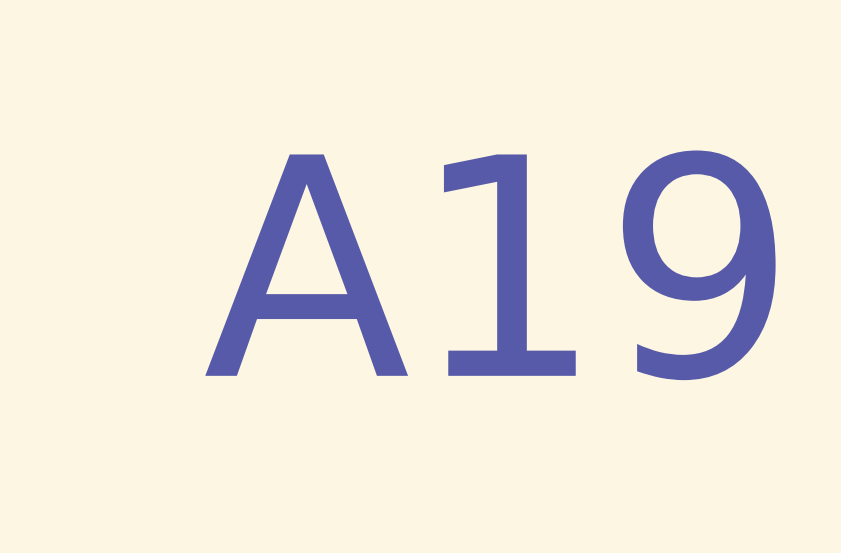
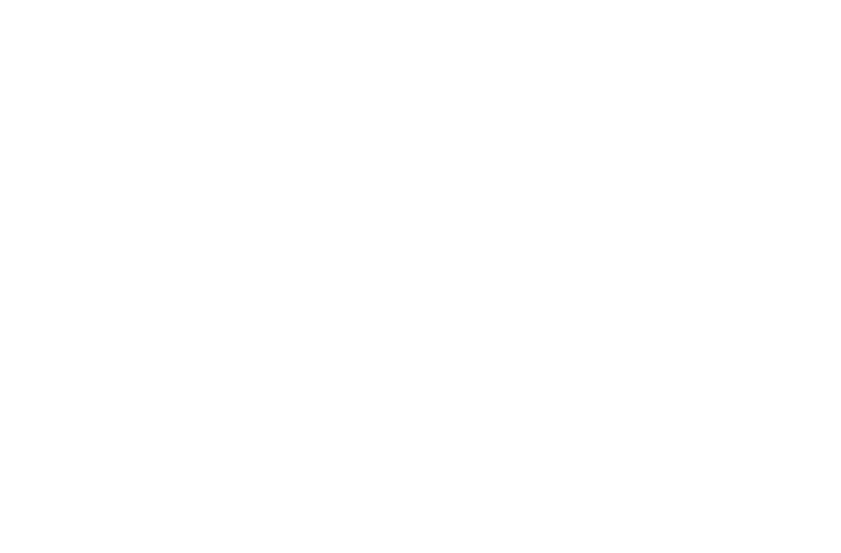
text: A19 (490, 265) -> none

